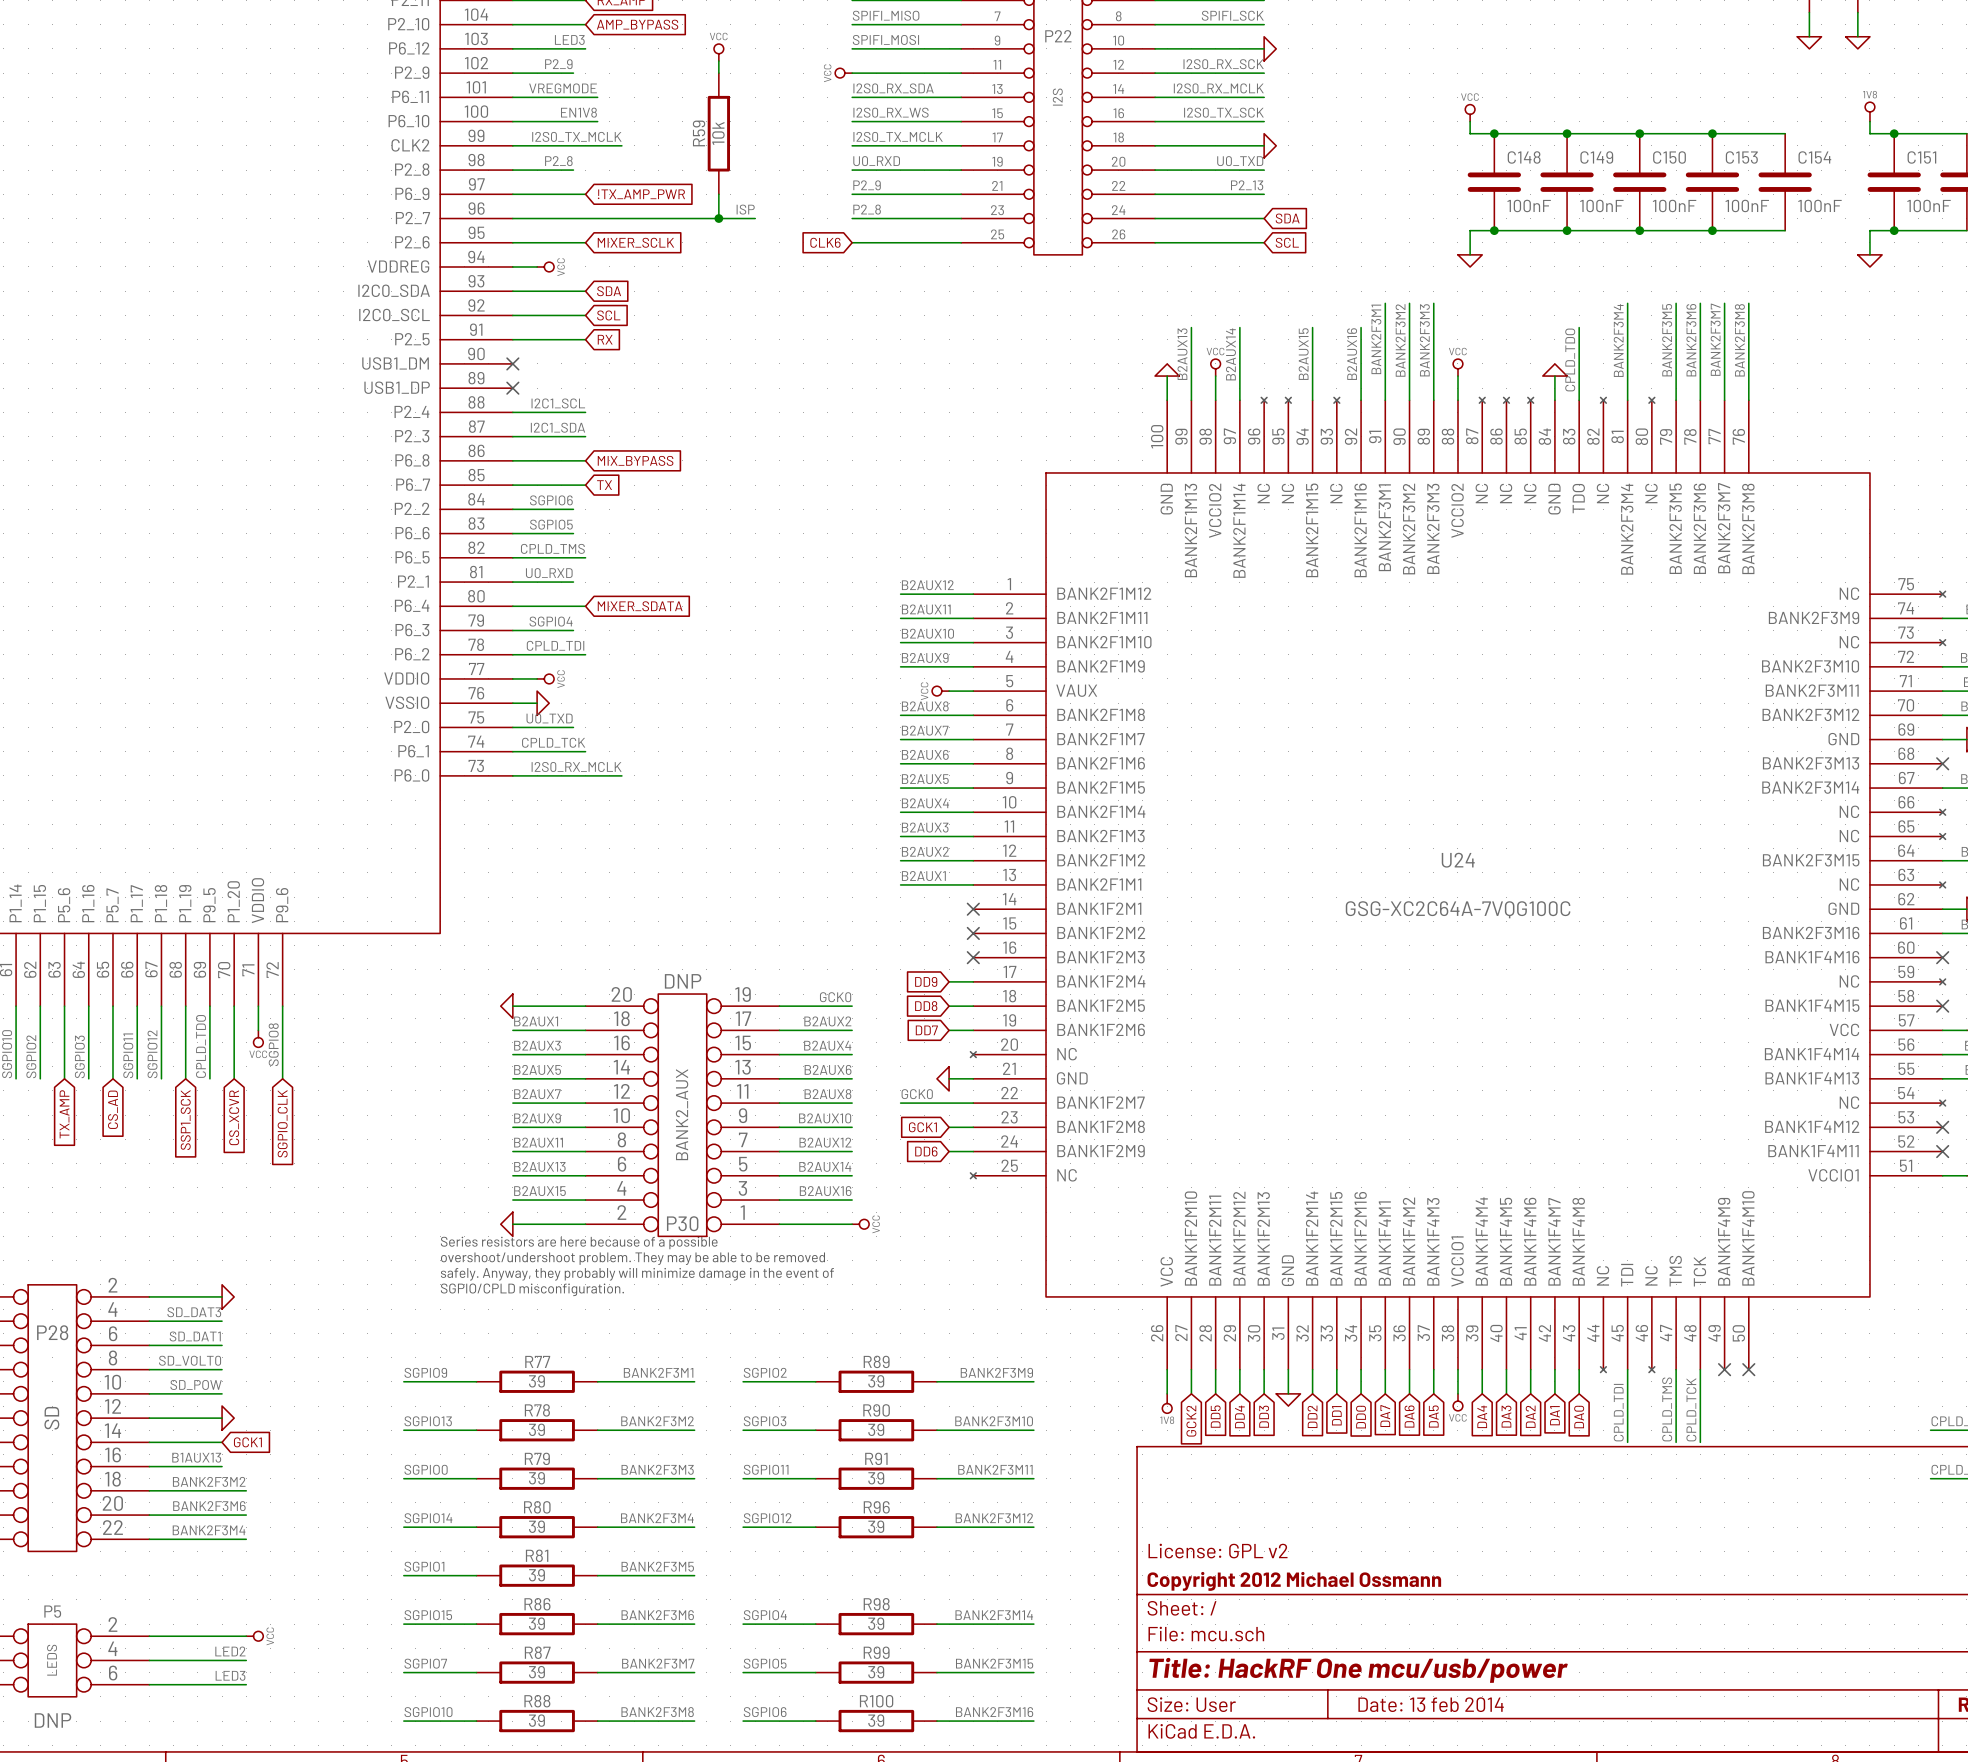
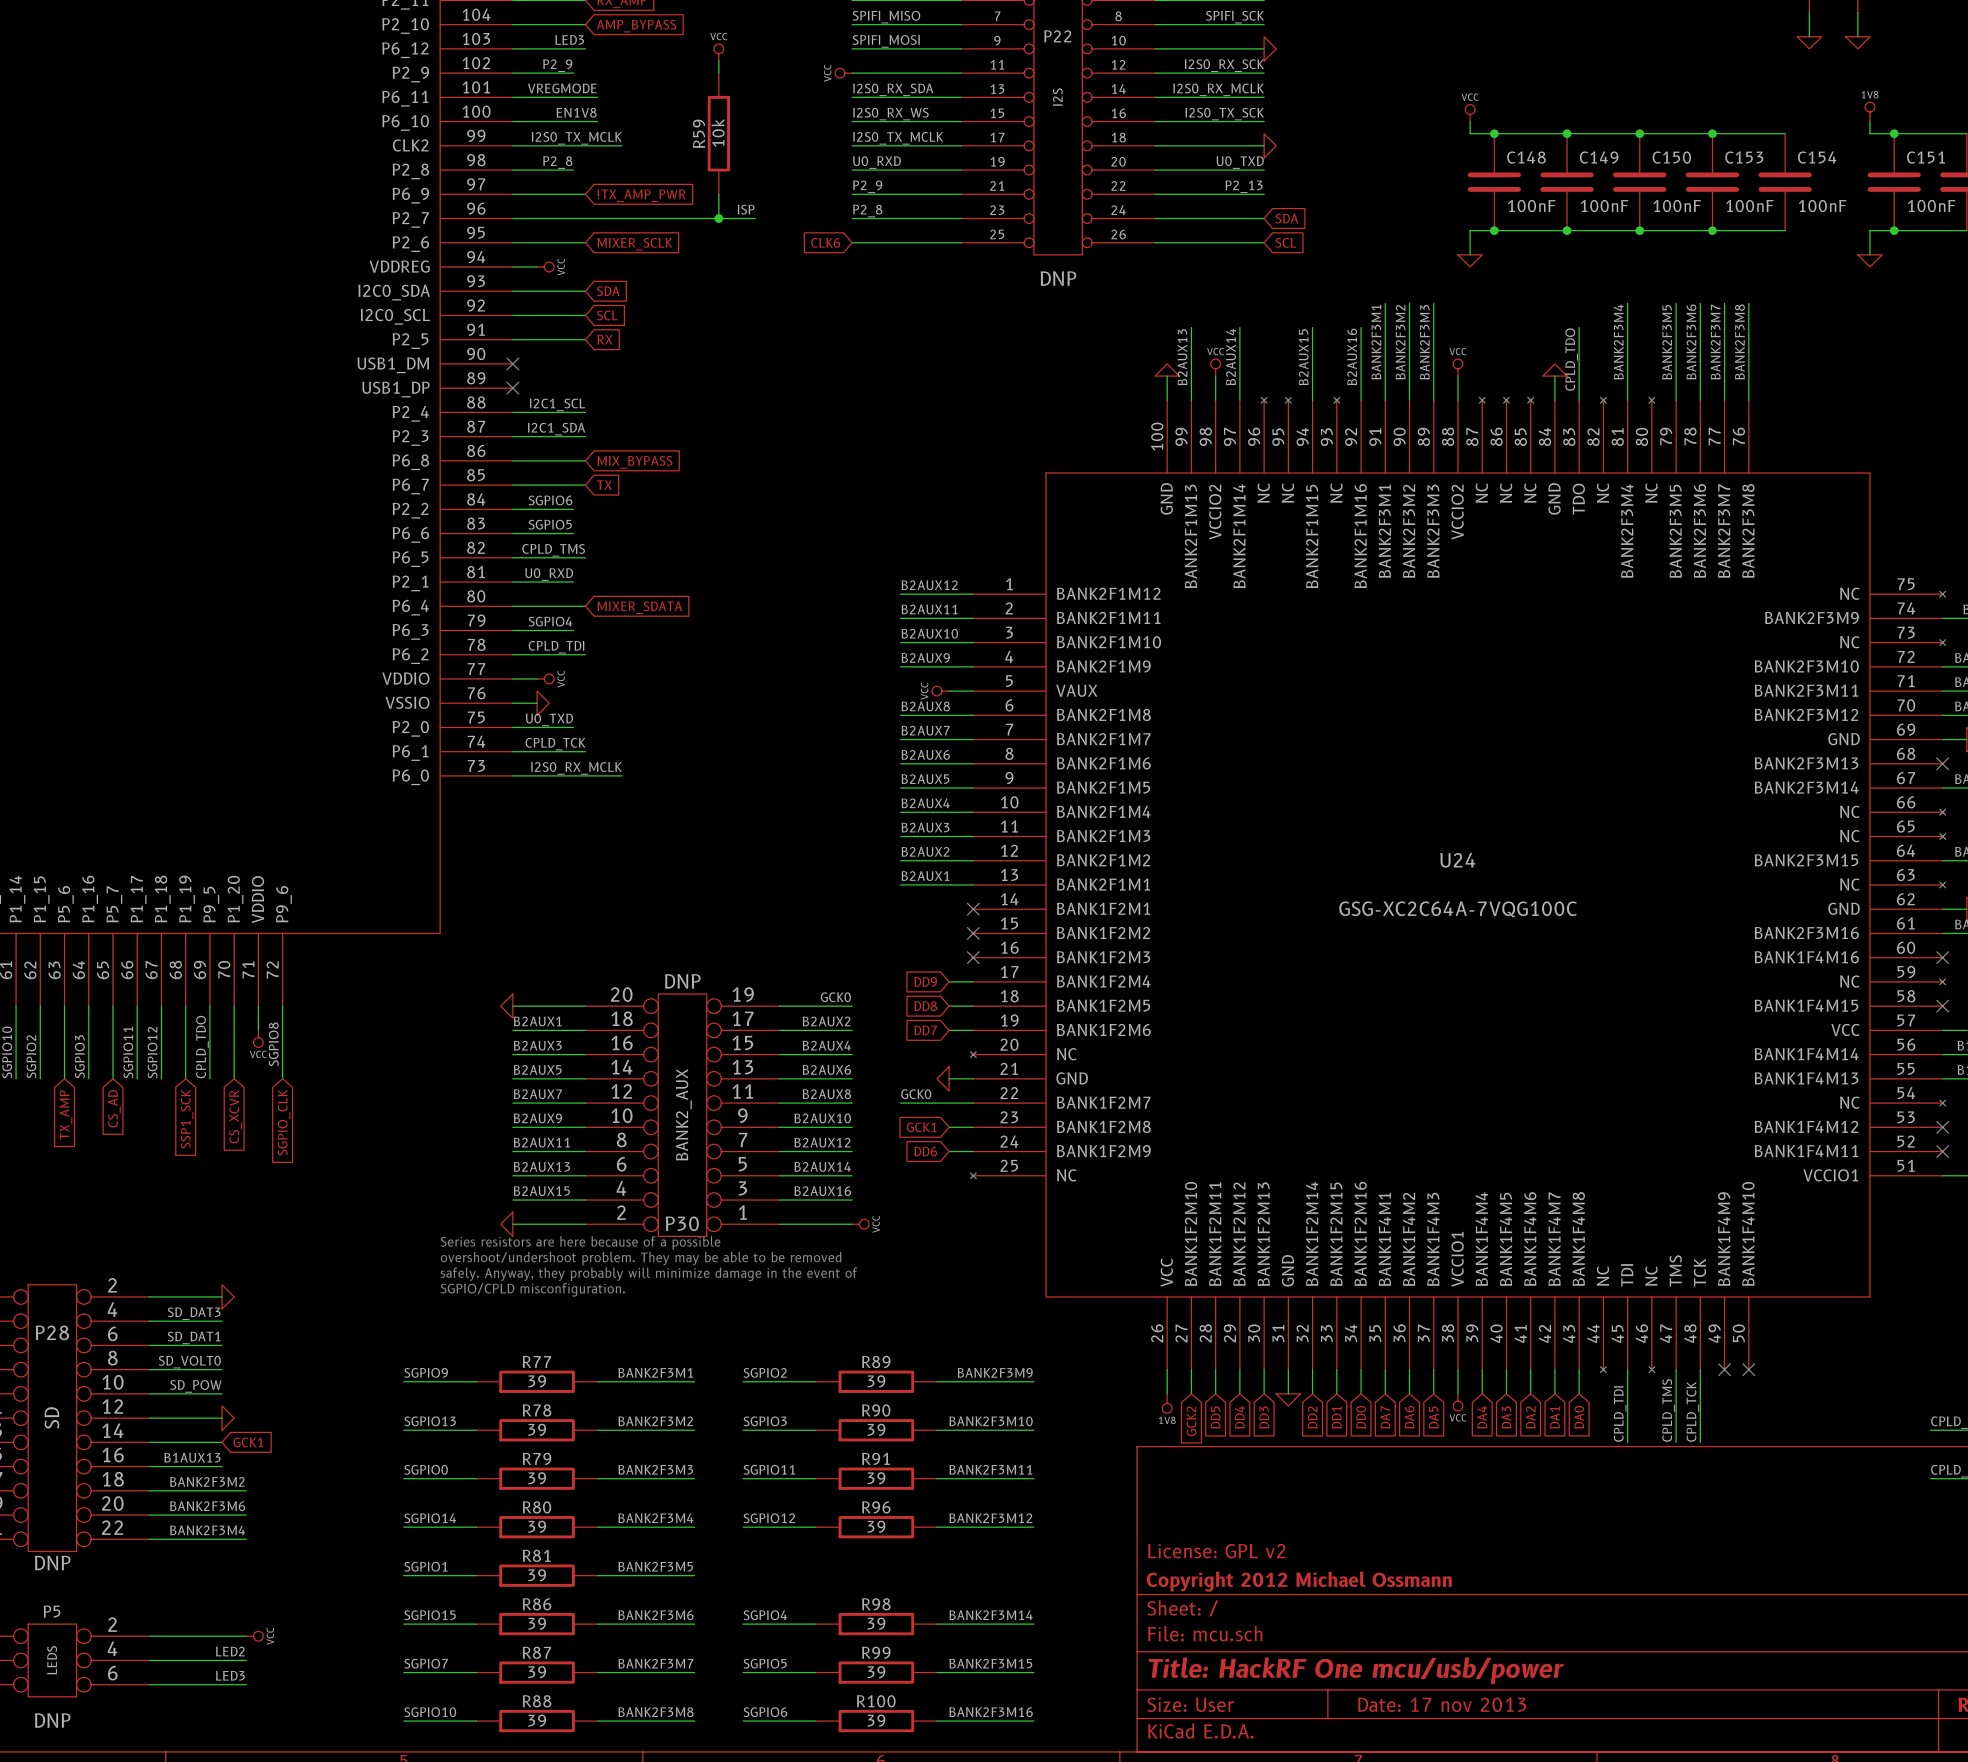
P22 text: none -> DNP (1058, 278)
P28 text: none -> DNP (52, 1562)
title block: Date: 13 feb 2014 (1431, 1704) -> Date: 17 nov 2013 (1442, 1704)

